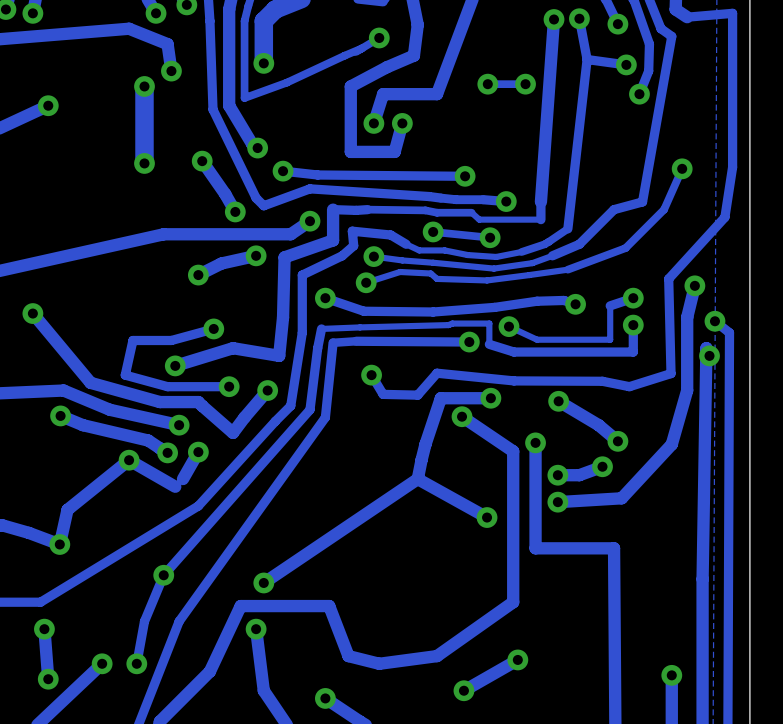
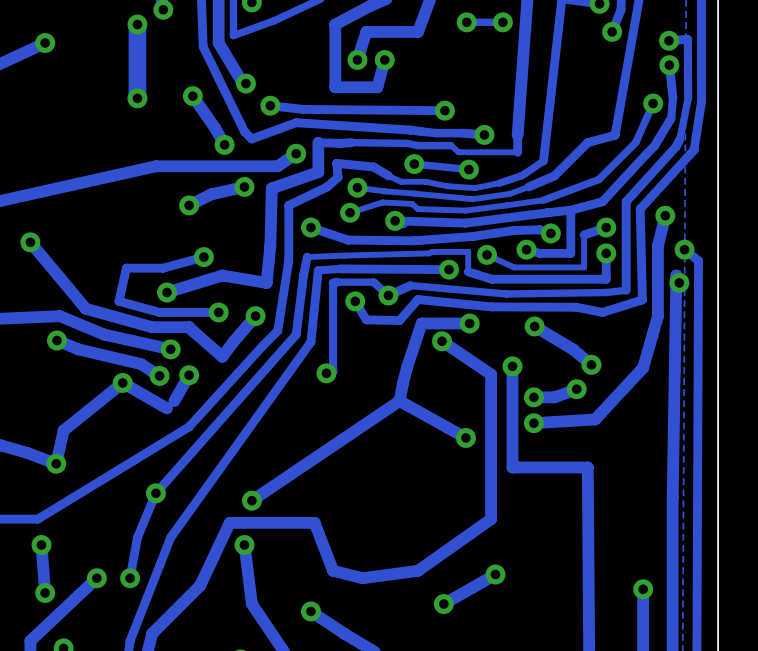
track: none -> (668, 40) (687, 39) (688, 98) (680, 138) (676, 146) (626, 201) (626, 290) (606, 292) (506, 293) (410, 285) (388, 295) (373, 282) (333, 282) (333, 371) (326, 373)
via: none -> (668, 40)
track: none -> (669, 65) (672, 98) (671, 118) (654, 146) (602, 201) (570, 210)
via: none -> (669, 65)
track: none -> (570, 210) (465, 223) (395, 220) (403, 223)
track: none -> (570, 210) (570, 253) (539, 253) (526, 249)
via: none -> (395, 220)
via: none -> (526, 249)
via: none -> (388, 295)
via: none -> (326, 373)

